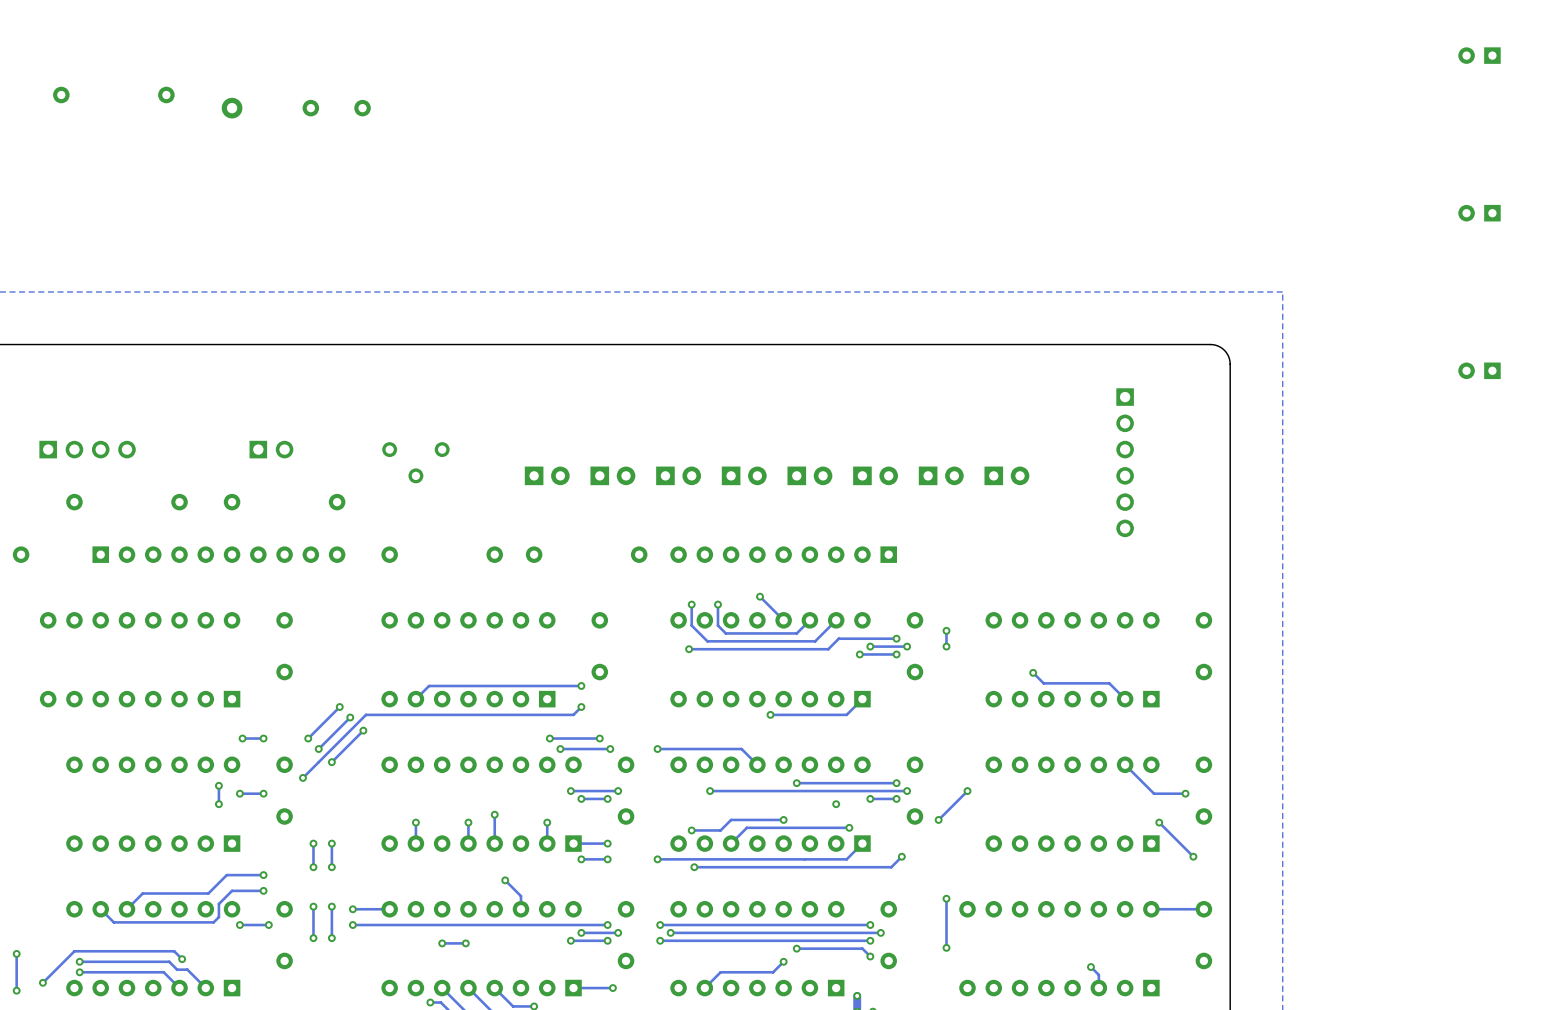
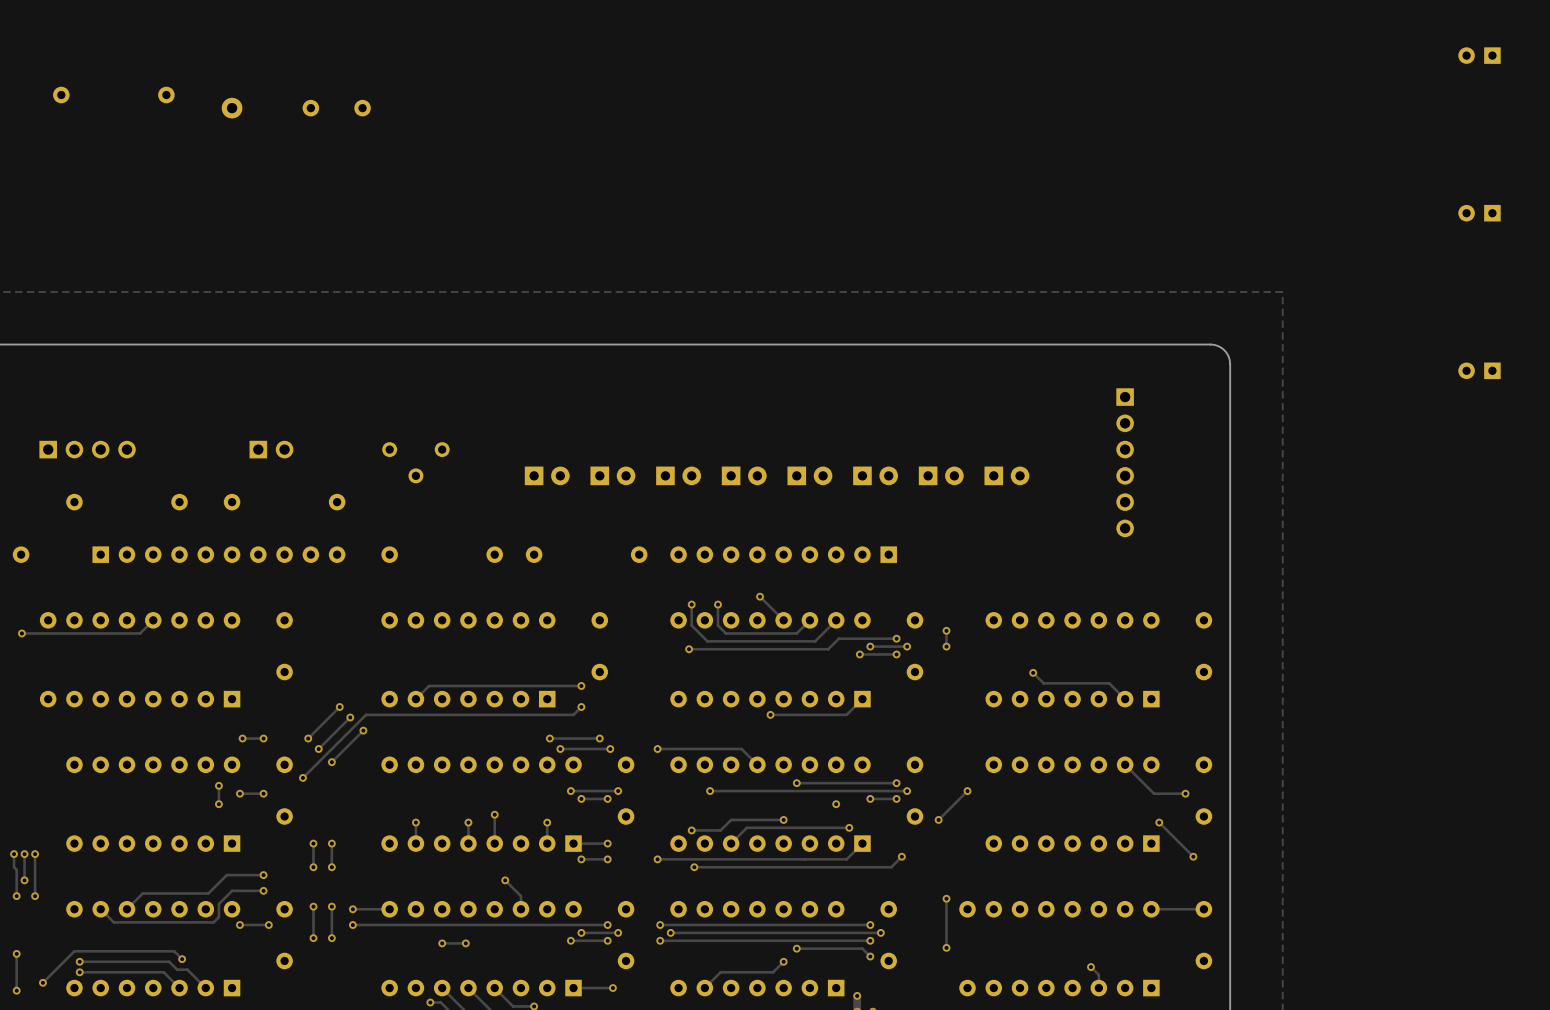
track: none -> (153, 620) (140, 633) (21, 633)
via: none -> (21, 633)
track: none -> (14, 854) (14, 867) (16, 869) (16, 896)
via: none -> (14, 854)
track: none -> (24, 854) (24, 880)
via: none -> (24, 854)
track: none -> (35, 854) (35, 896)
via: none -> (35, 854)
via: none -> (24, 880)
via: none -> (16, 896)
via: none -> (35, 896)

